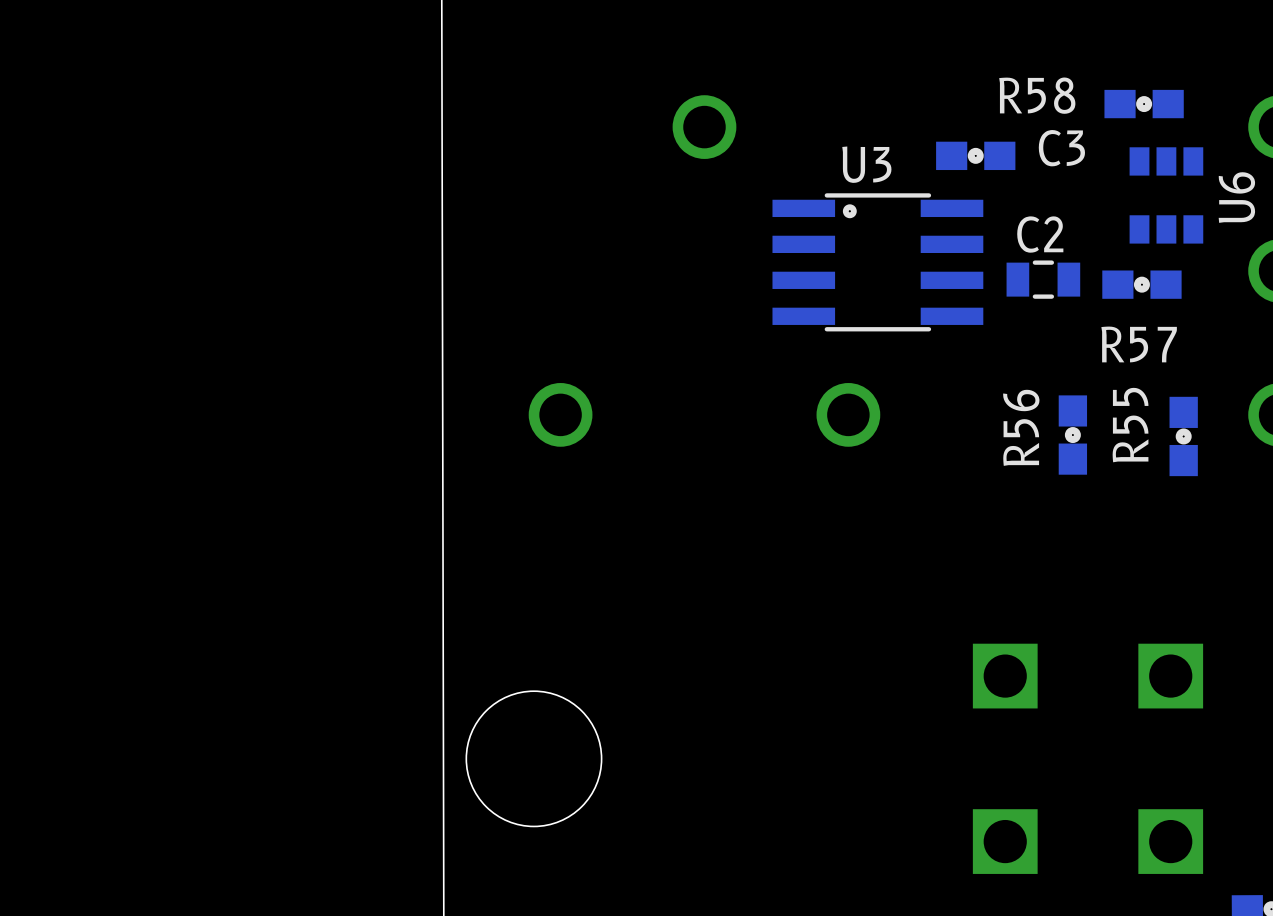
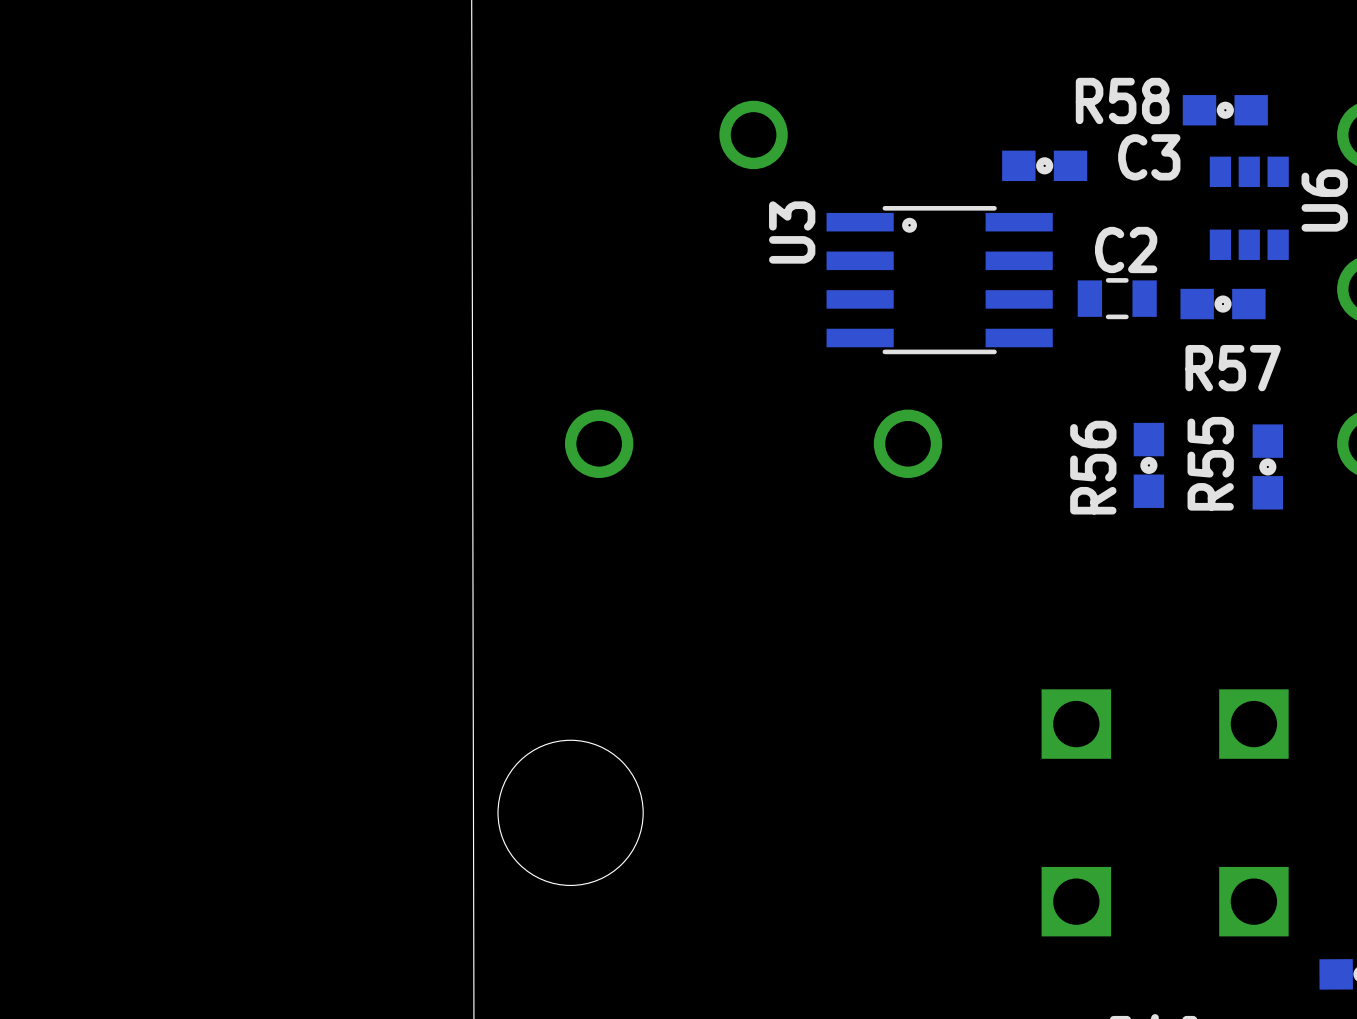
U3 name rotation: 0° (866, 164) -> 90° counterclockwise (792, 232)
U3 name position: U3 (866, 164) -> U3 (792, 232)

